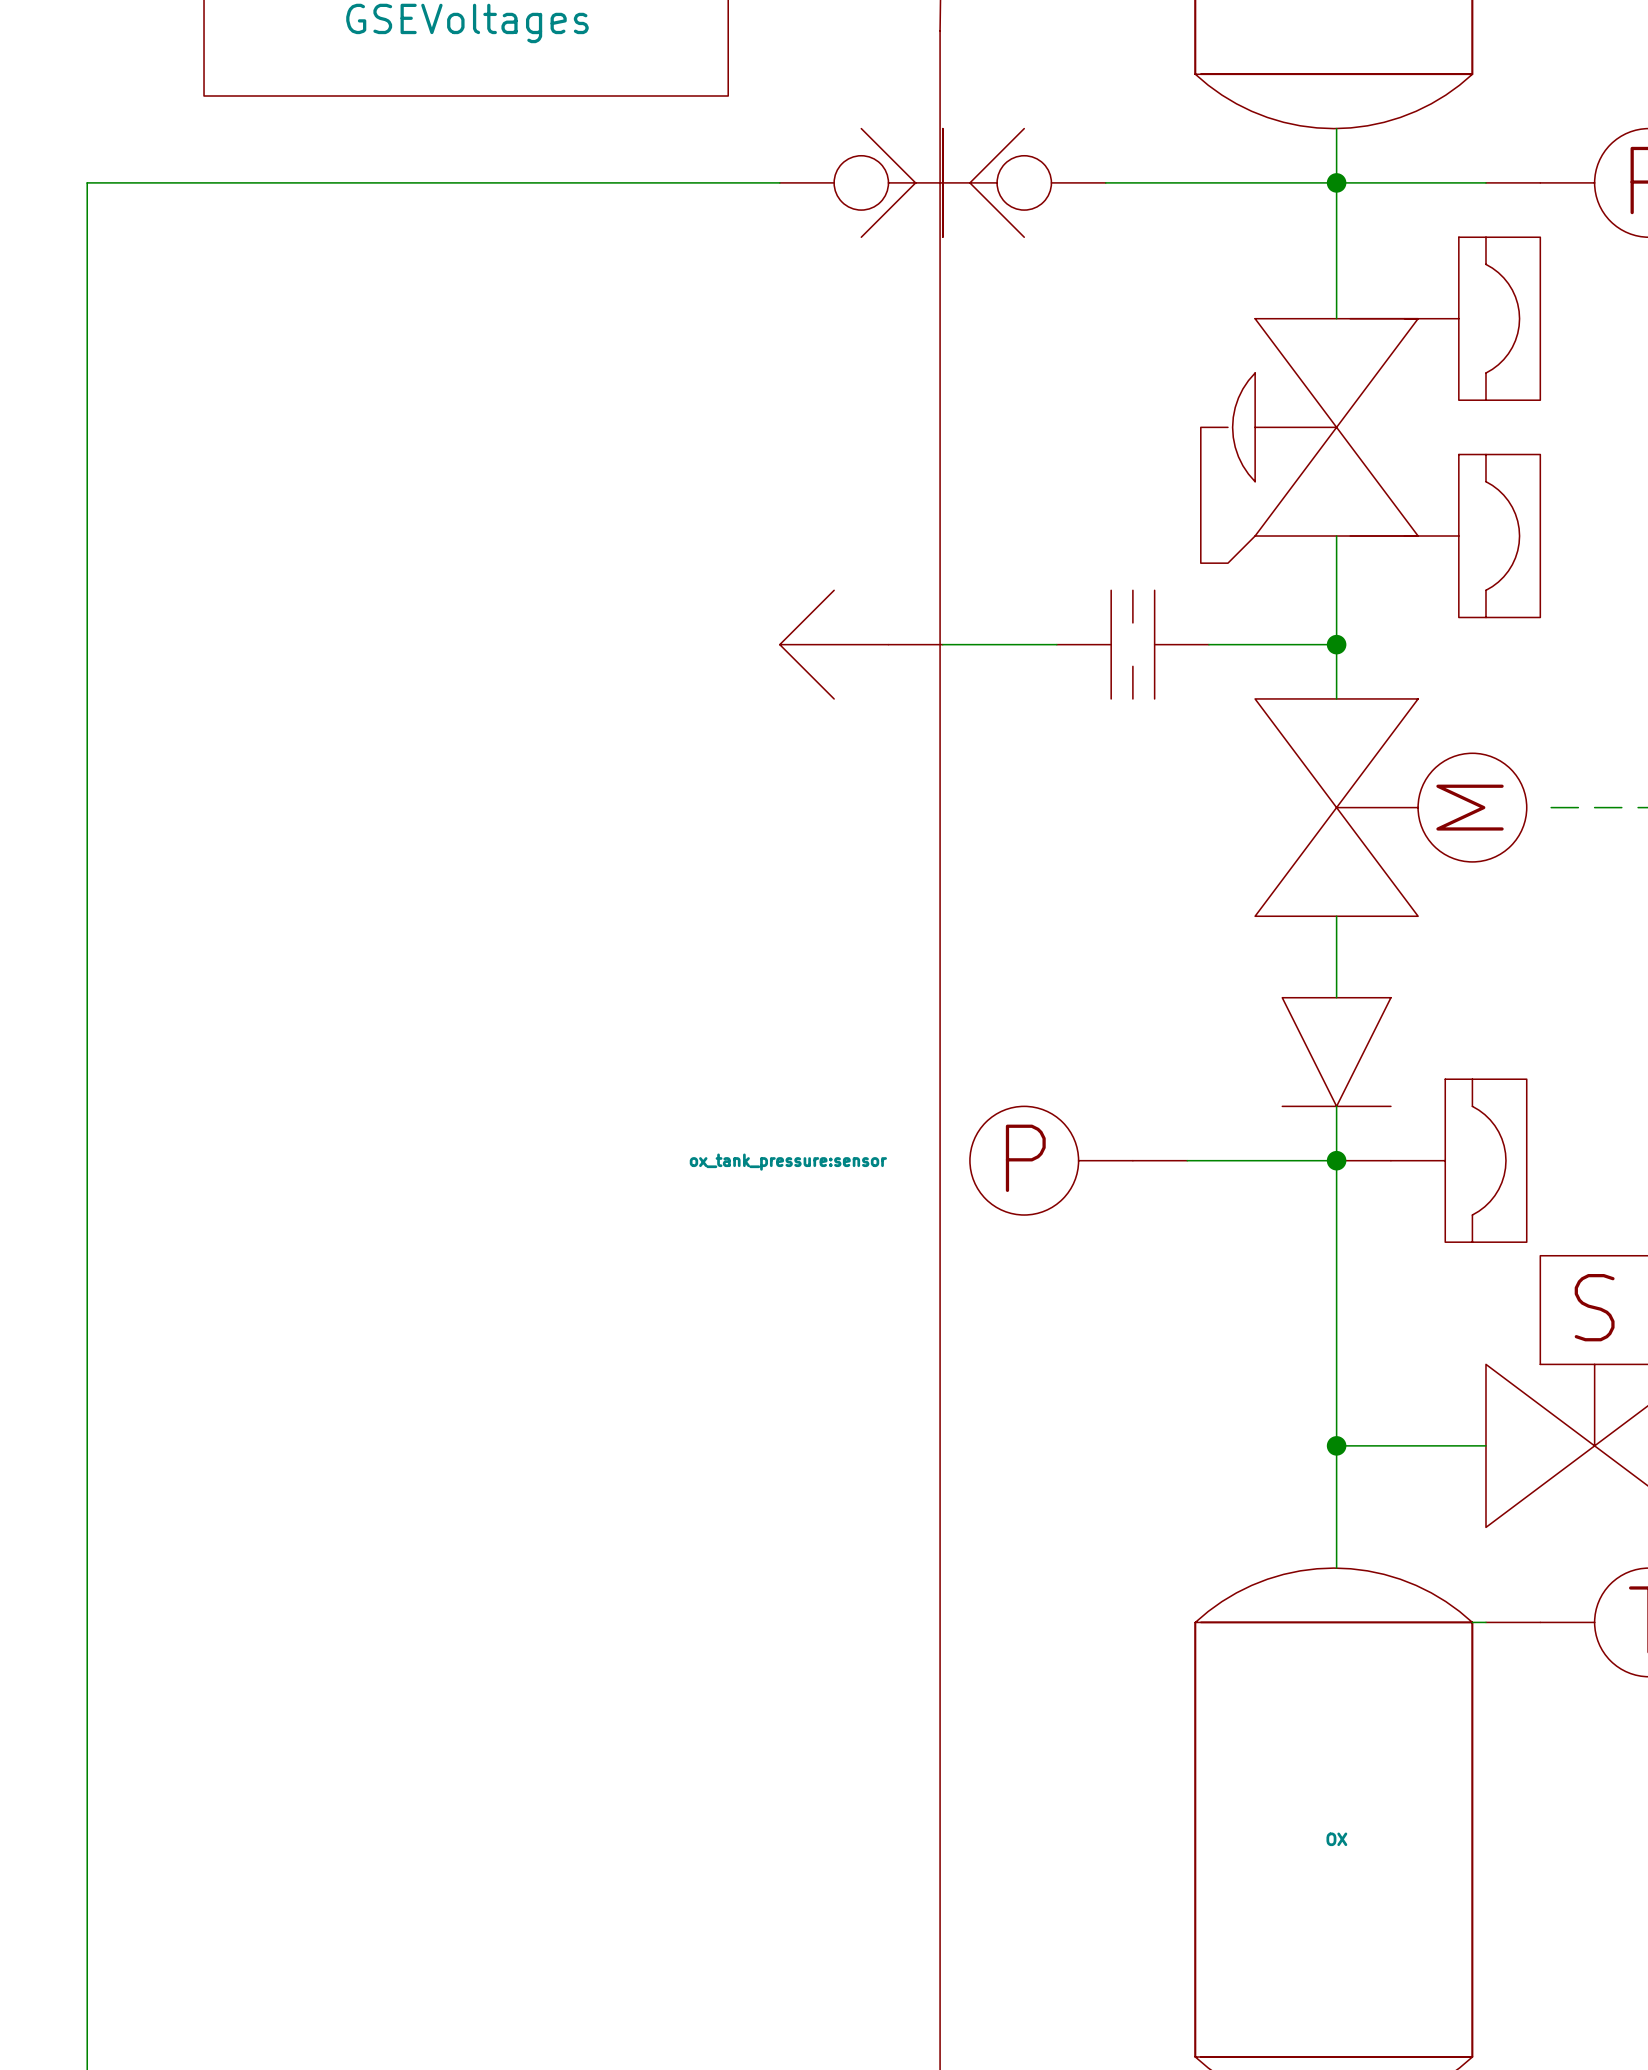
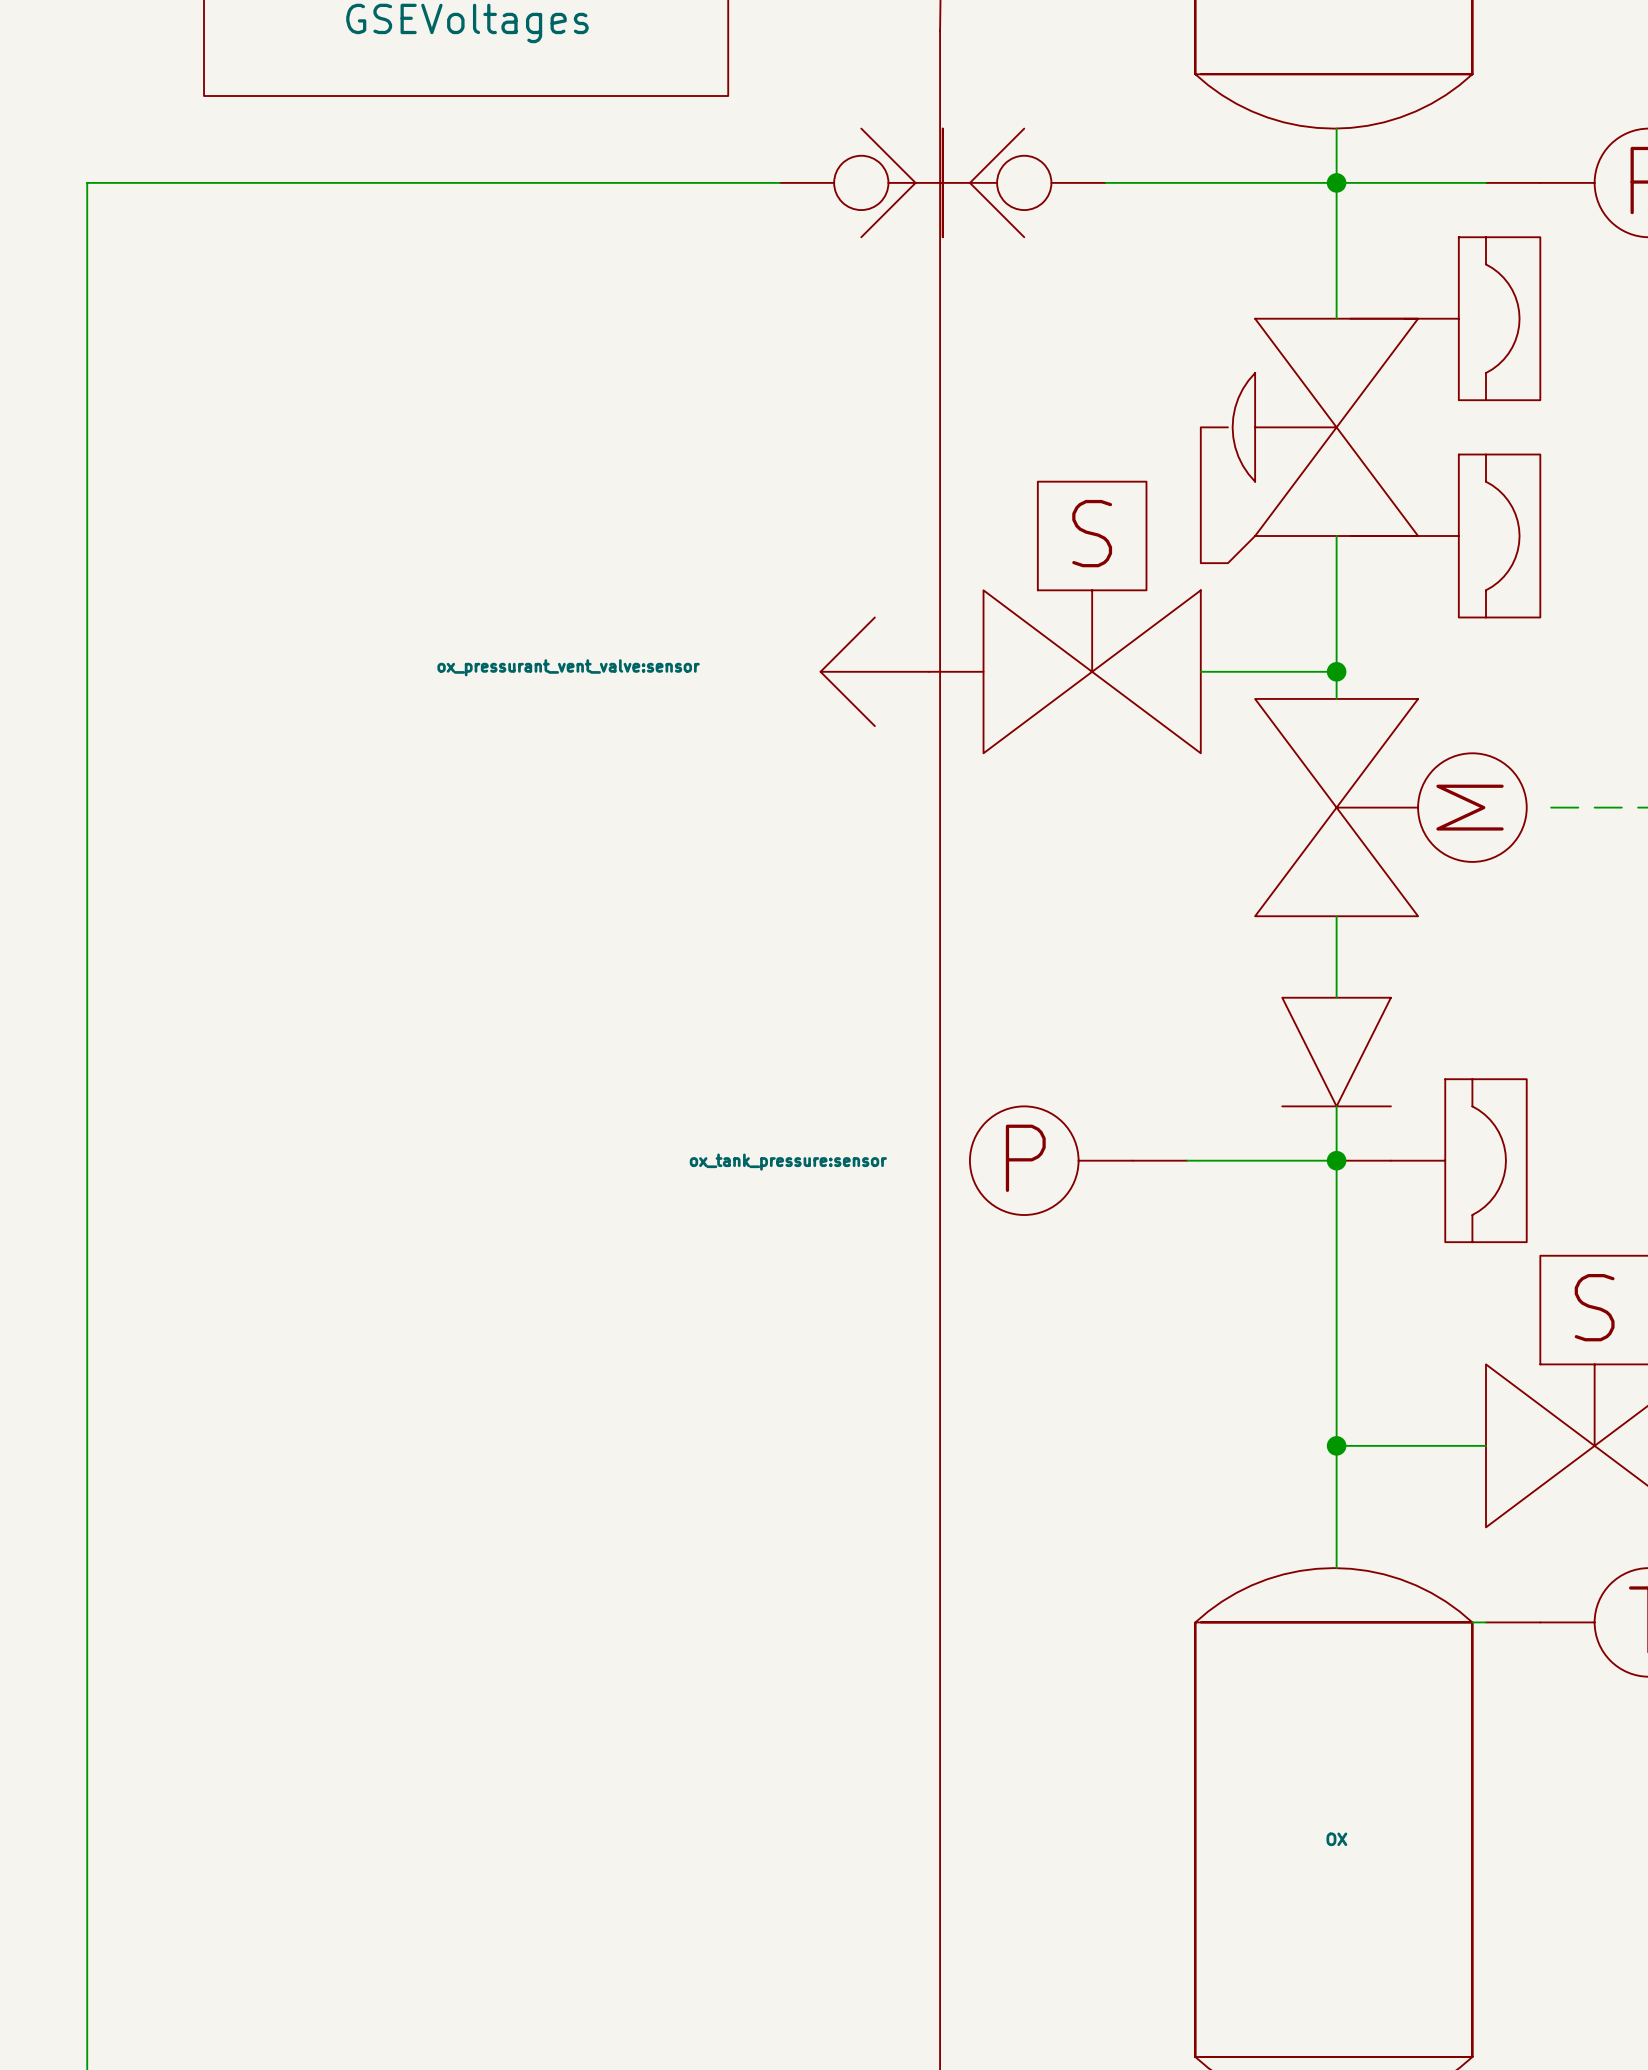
part: none -> ox_pressurant_vent_valve:sensor (1092, 617)
part position: (861, 644) -> (902, 671)
wire: (942, 644) (1056, 644) -> none
part: (1132, 644) -> none
wire: (1208, 644) (1336, 644) -> none
junction position: (1336, 644) -> (1336, 671)
wire: none -> (1200, 671) (1336, 671)

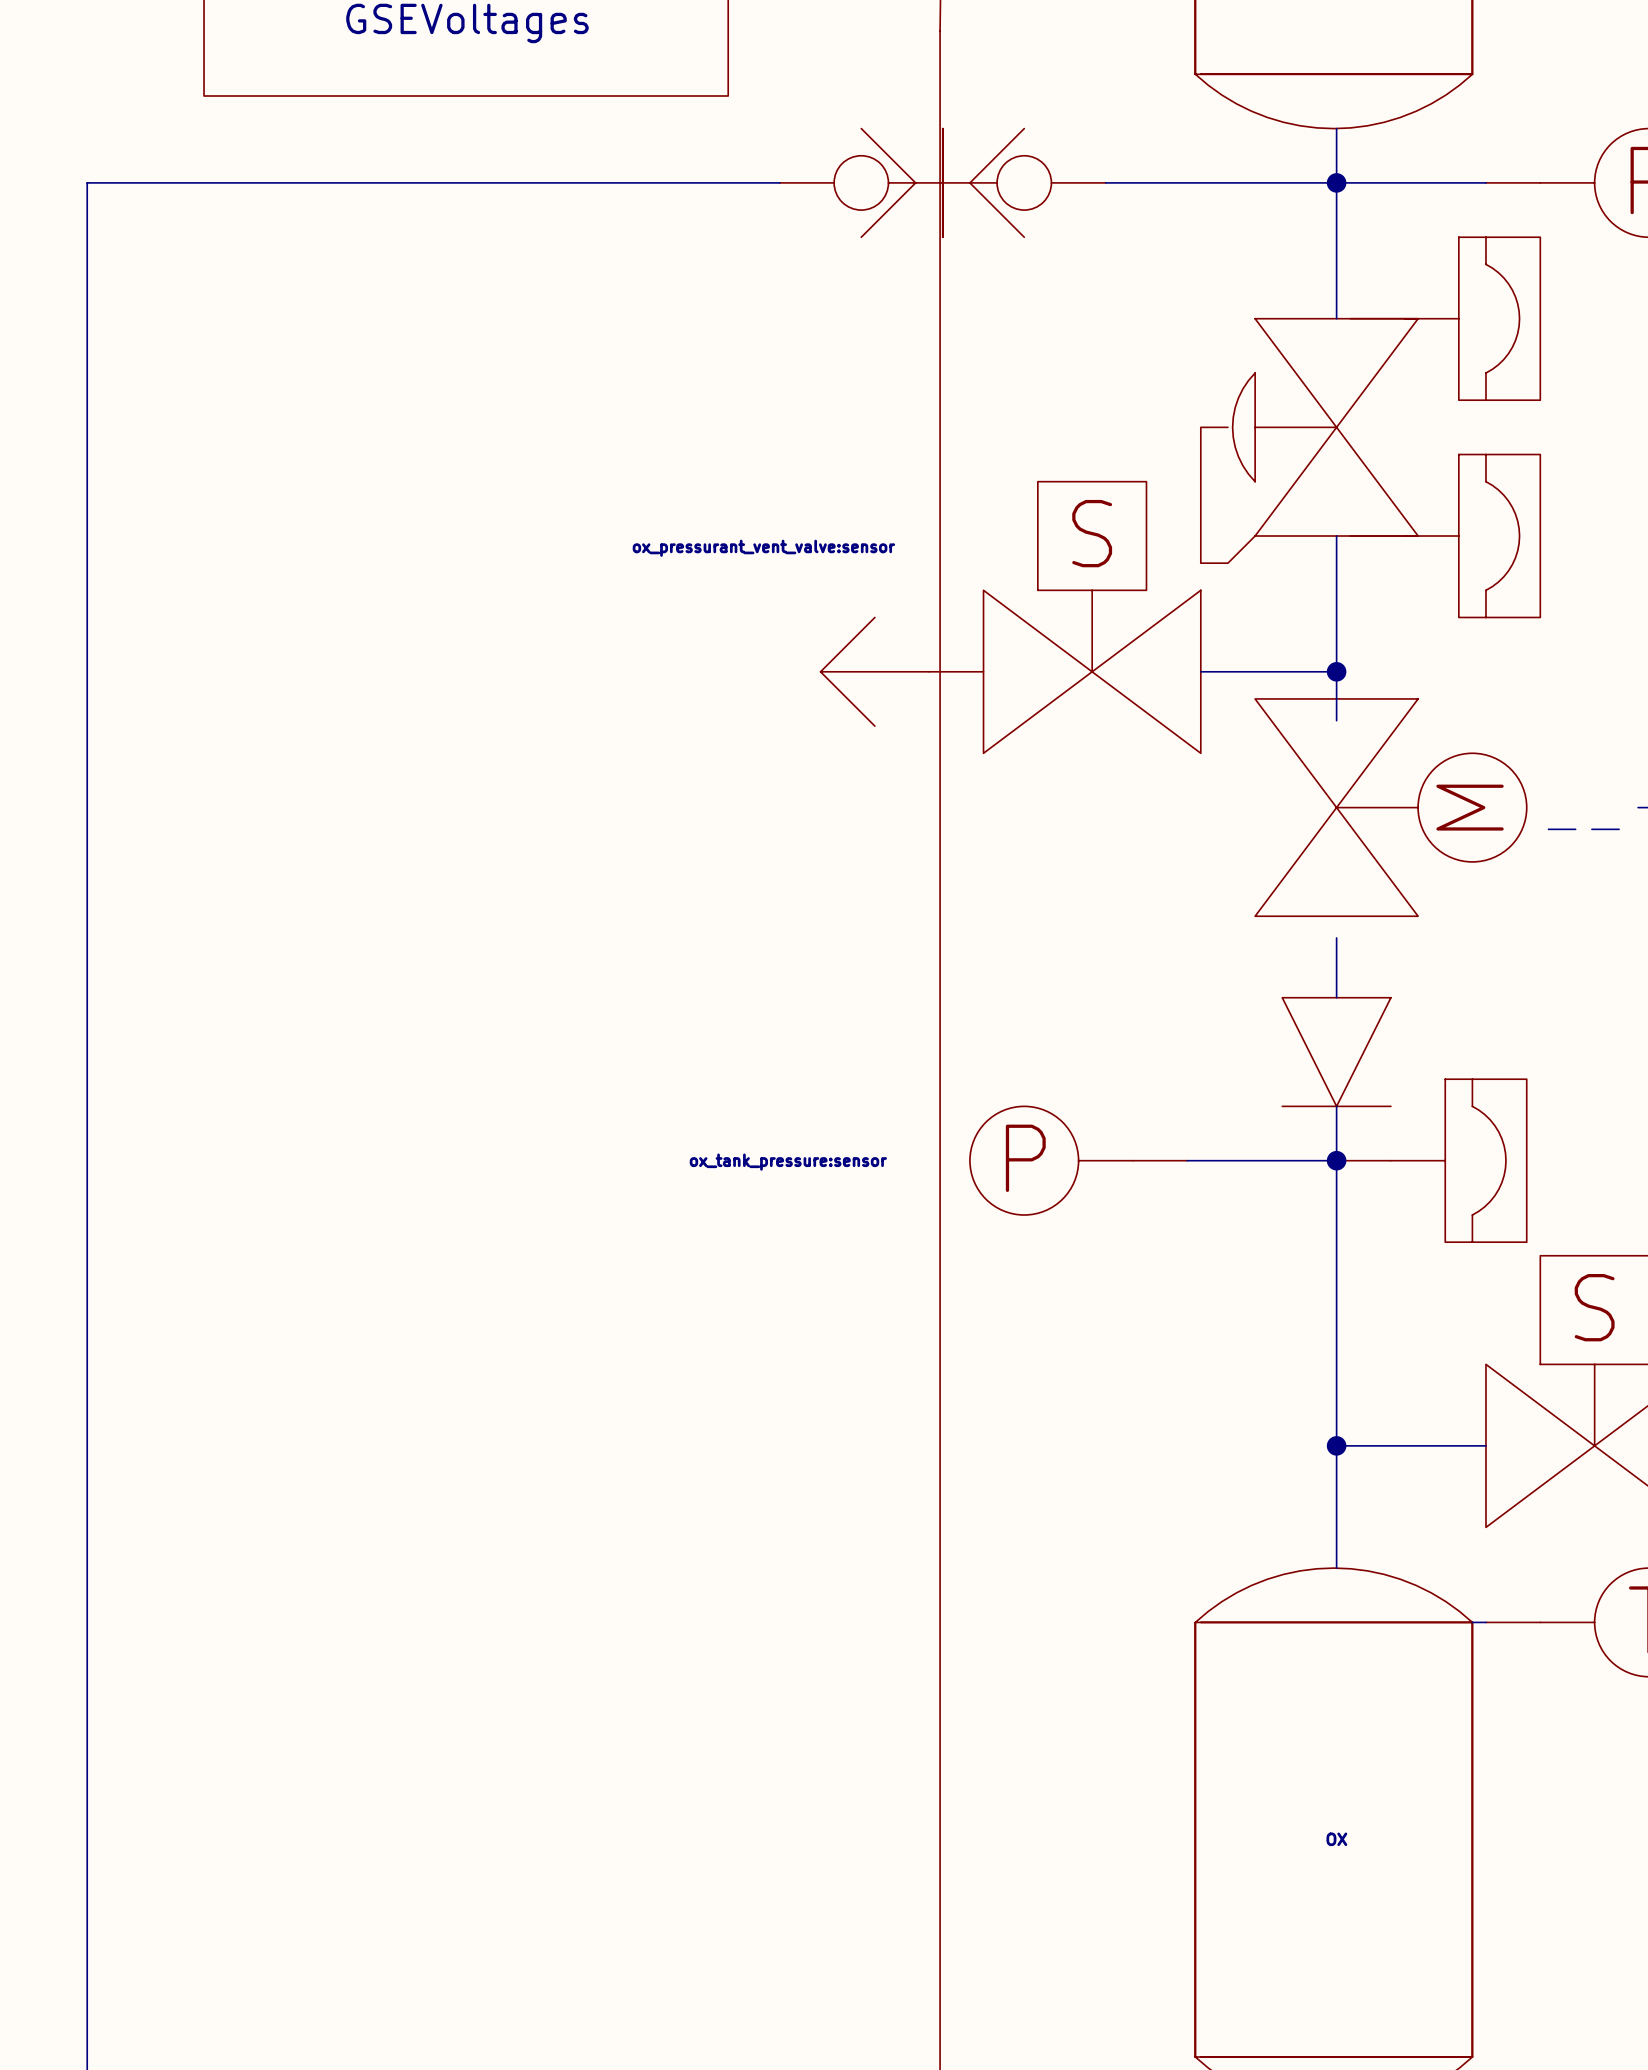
part value position: ox_pressurant_vent_valve:sensor (568, 667) -> ox_pressurant_vent_valve:sensor (763, 548)
wire: (1551, 807) (1578, 807) -> (1548, 829) (1575, 829)
wire: (1594, 807) (1621, 807) -> (1591, 829) (1619, 829)
wire: (1336, 916) (1336, 937) -> (1336, 698) (1336, 720)

